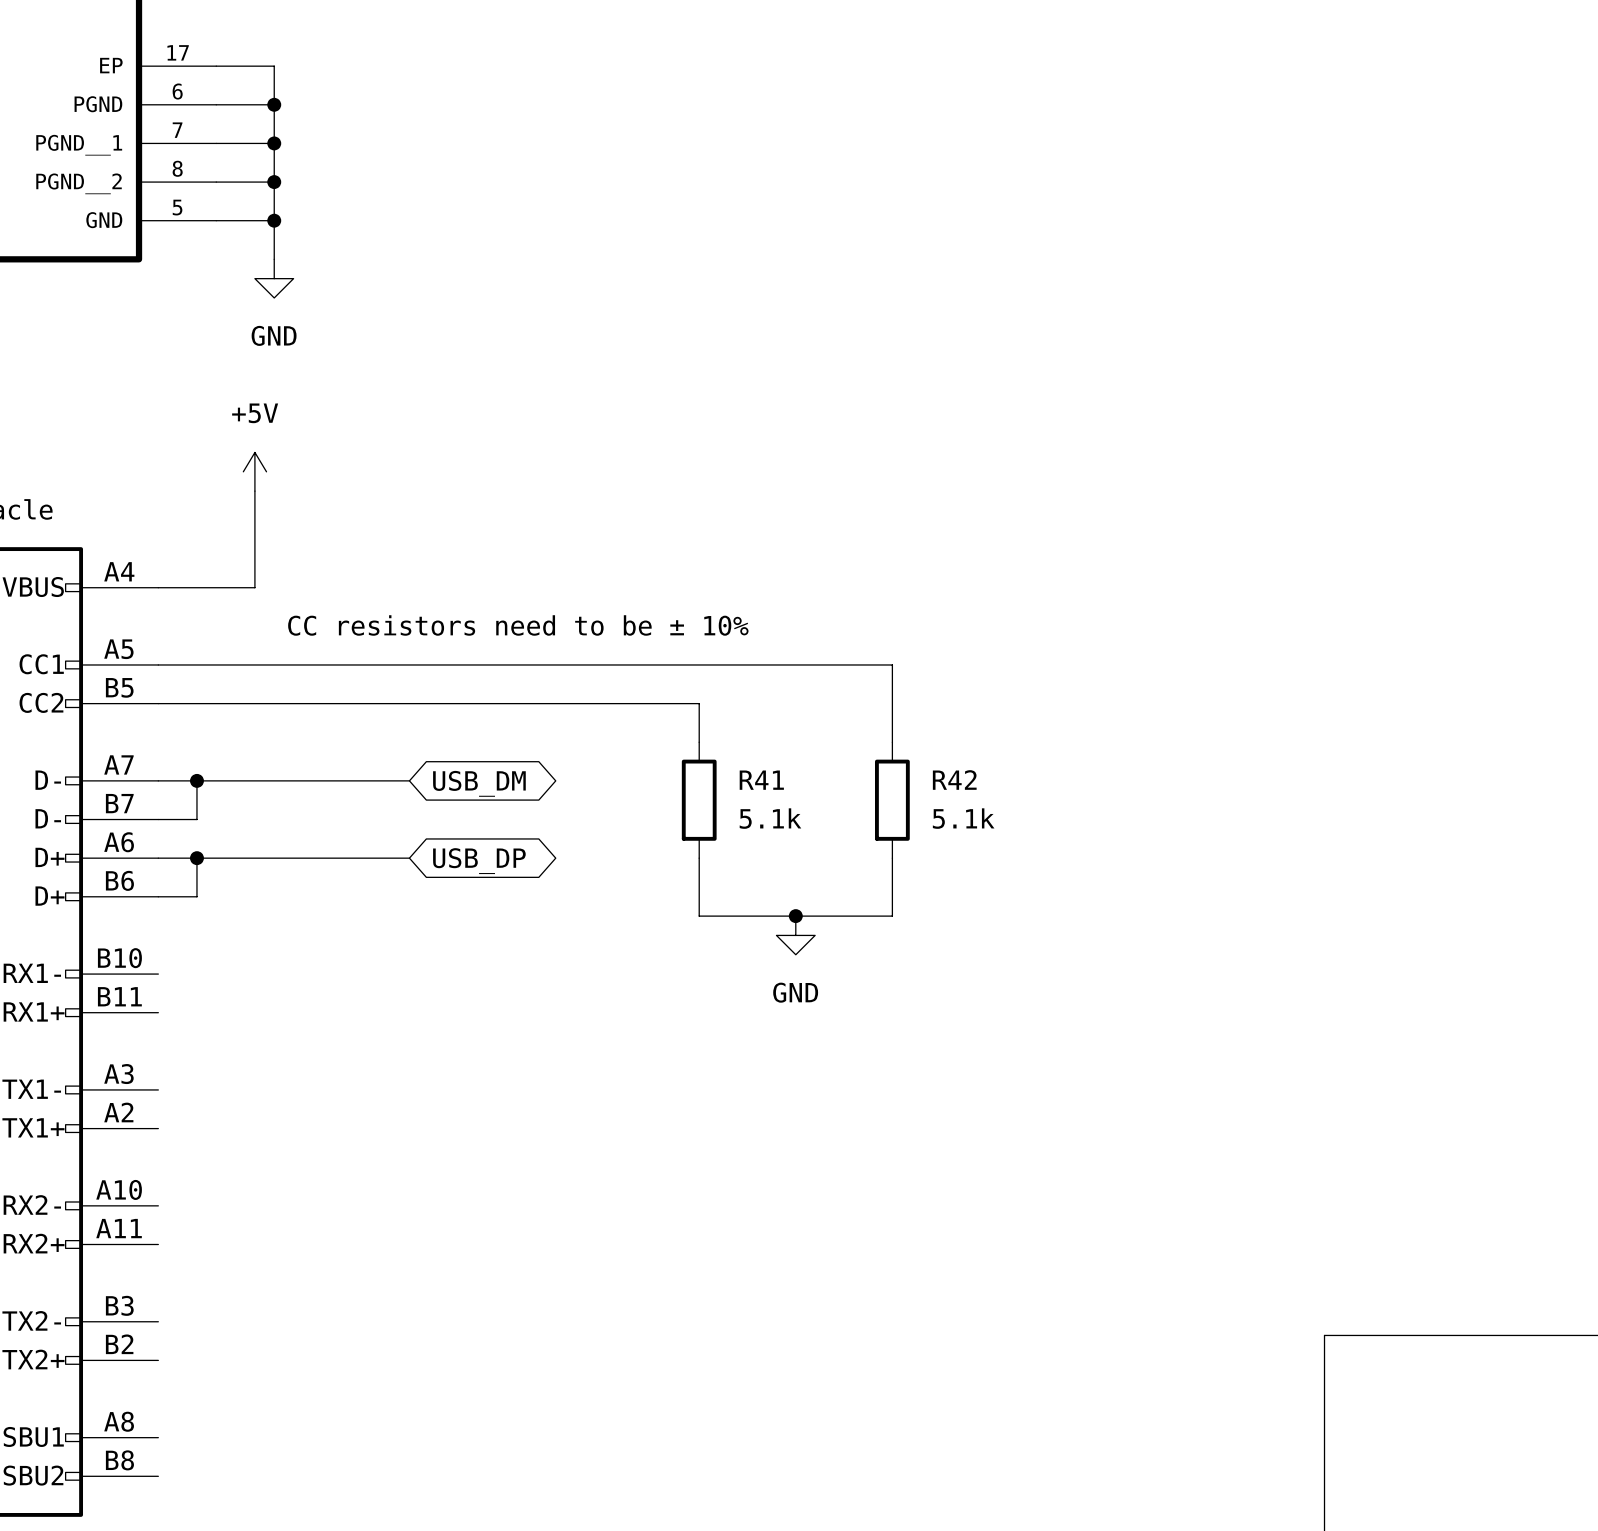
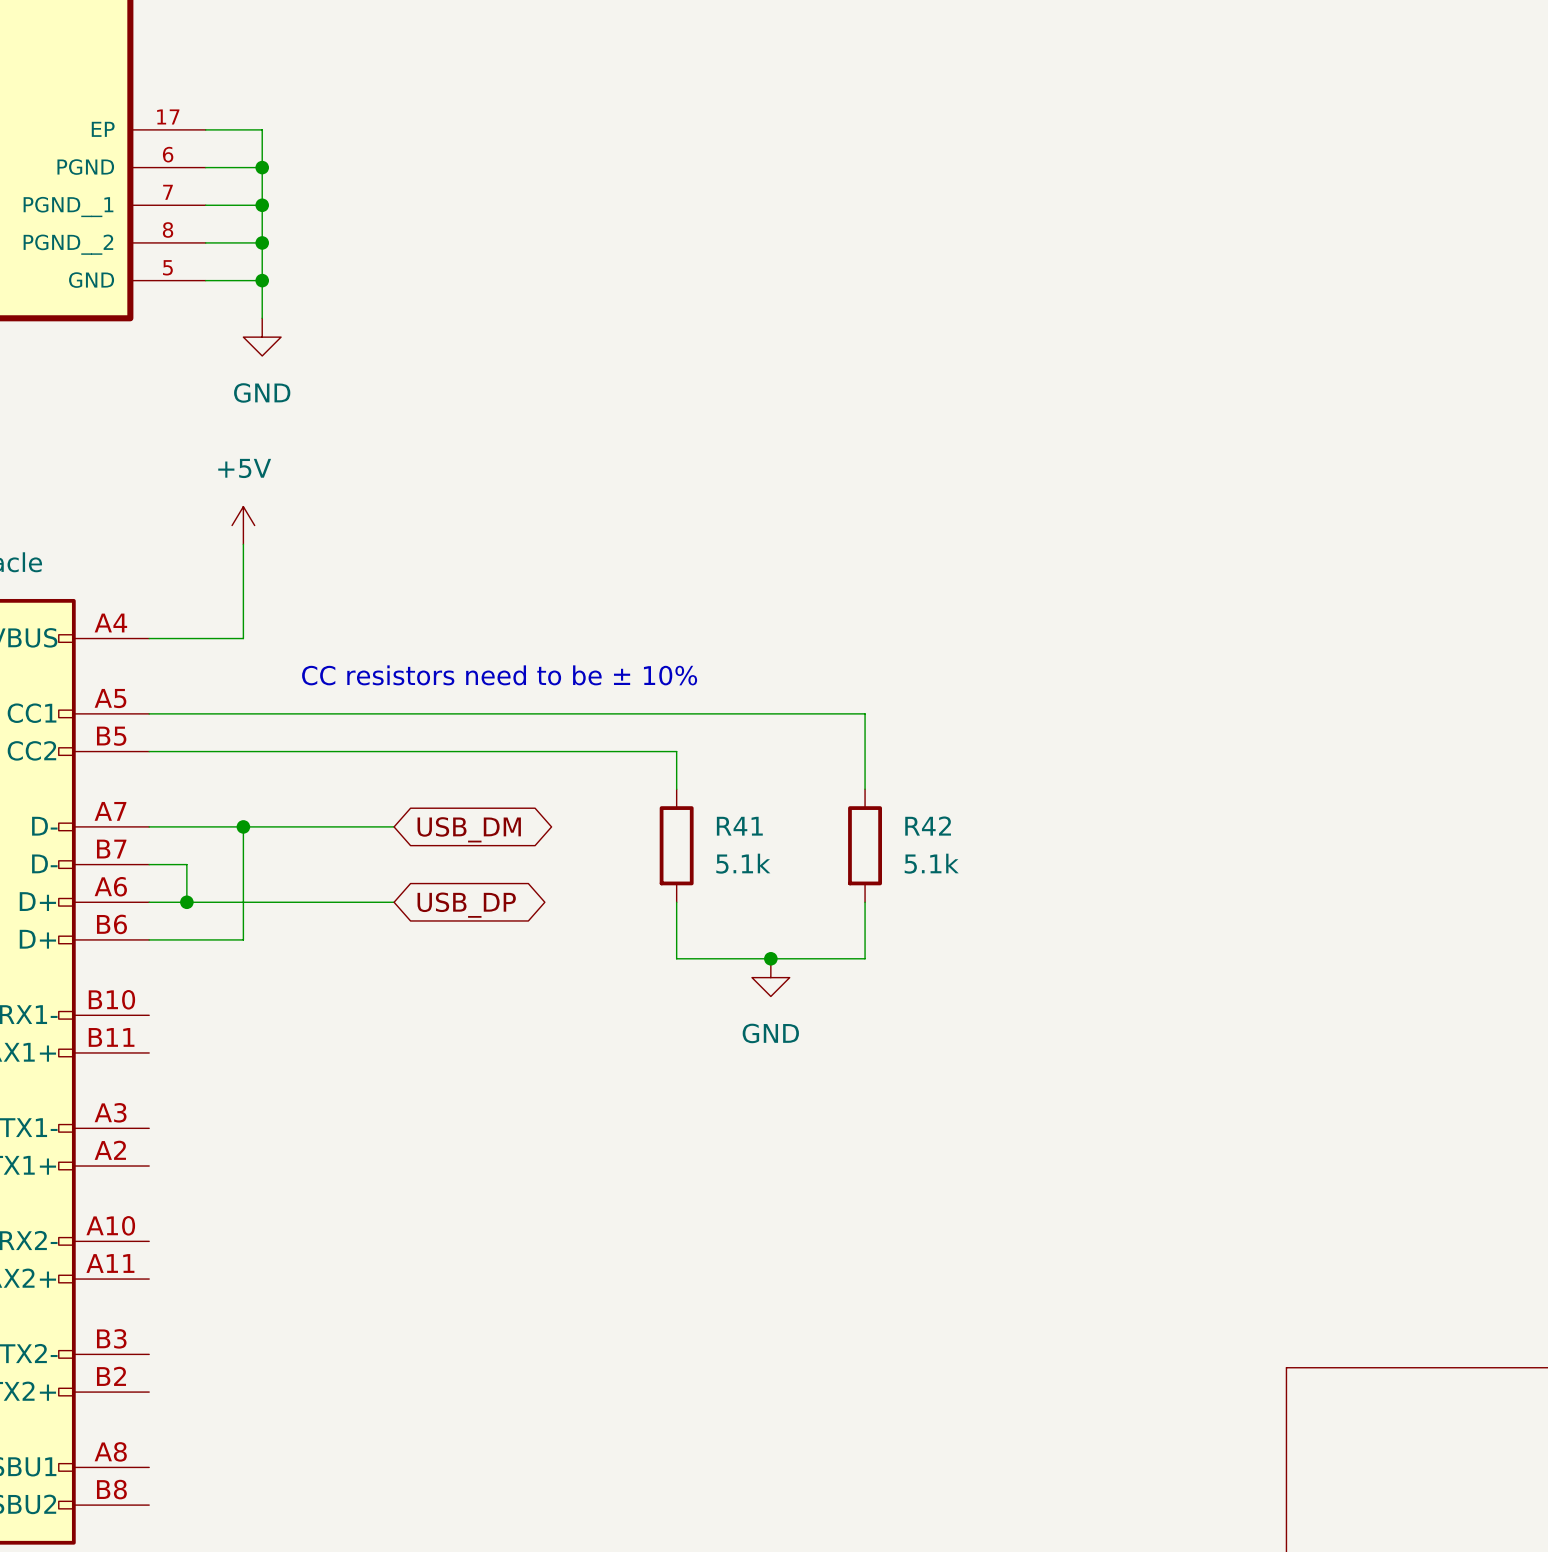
wire: (196, 780) (196, 819) -> none
junction position: (196, 780) -> (243, 826)
wire: none -> (243, 826) (243, 939) (186, 939)
wire: (196, 858) (196, 896) -> (186, 902) (186, 864)

